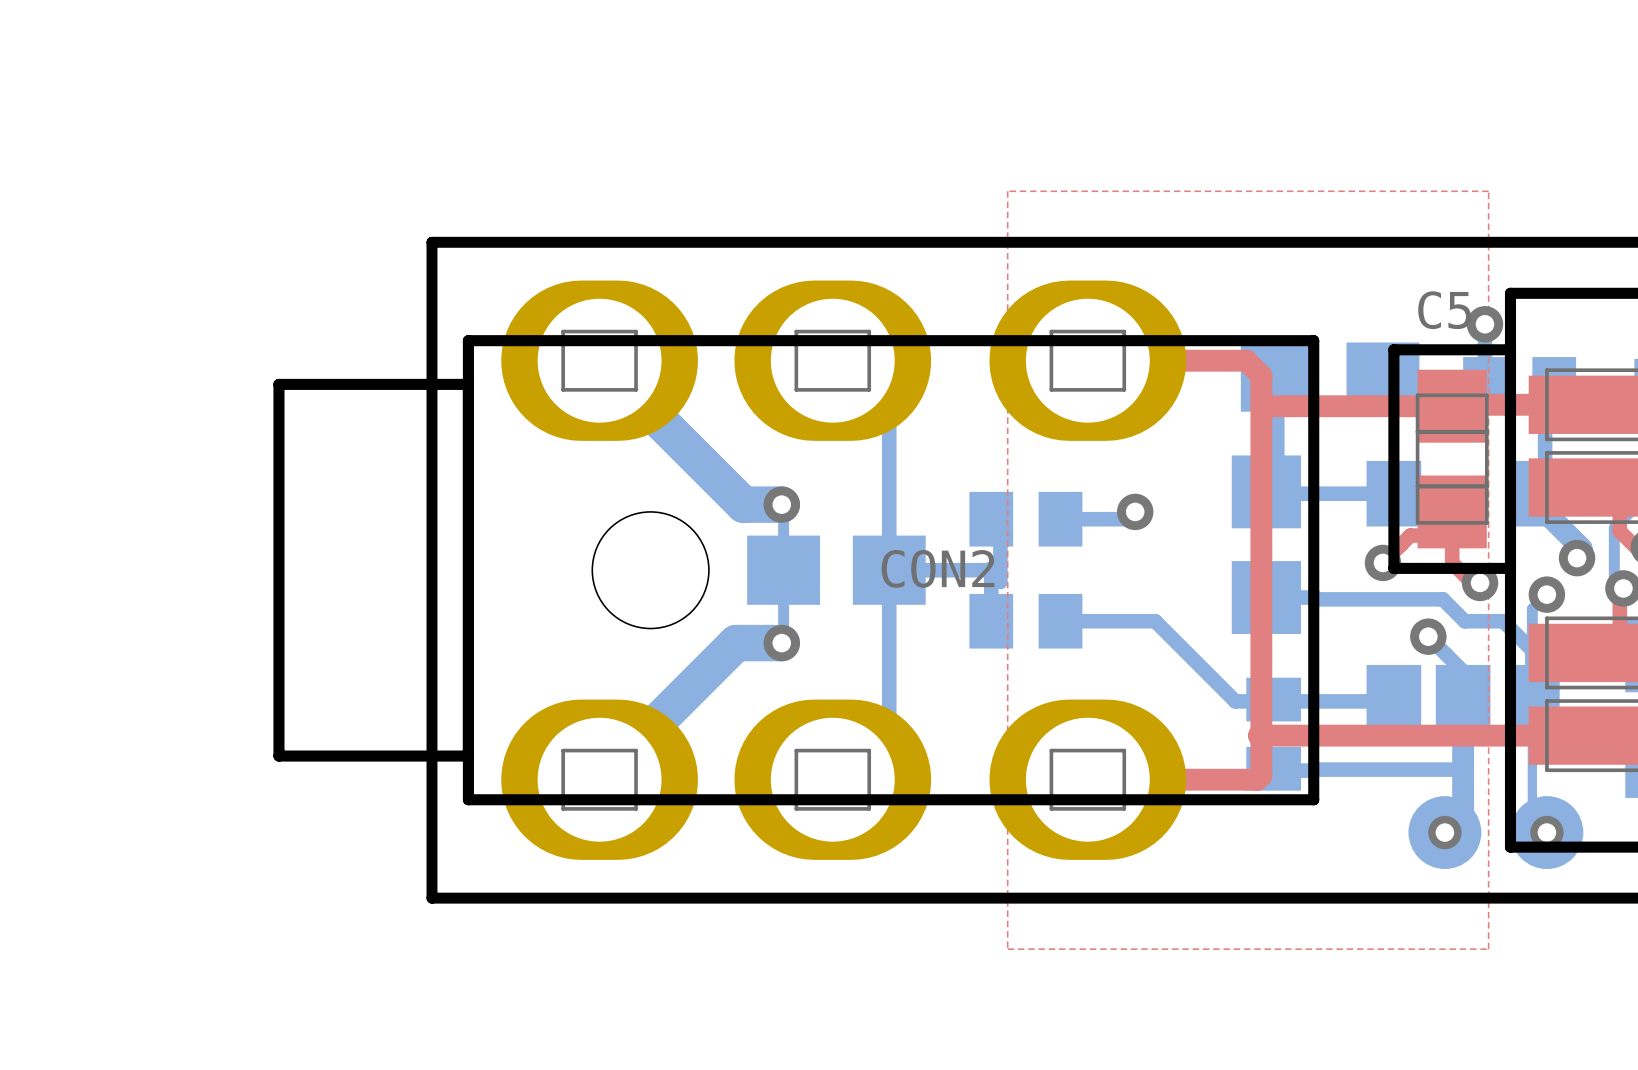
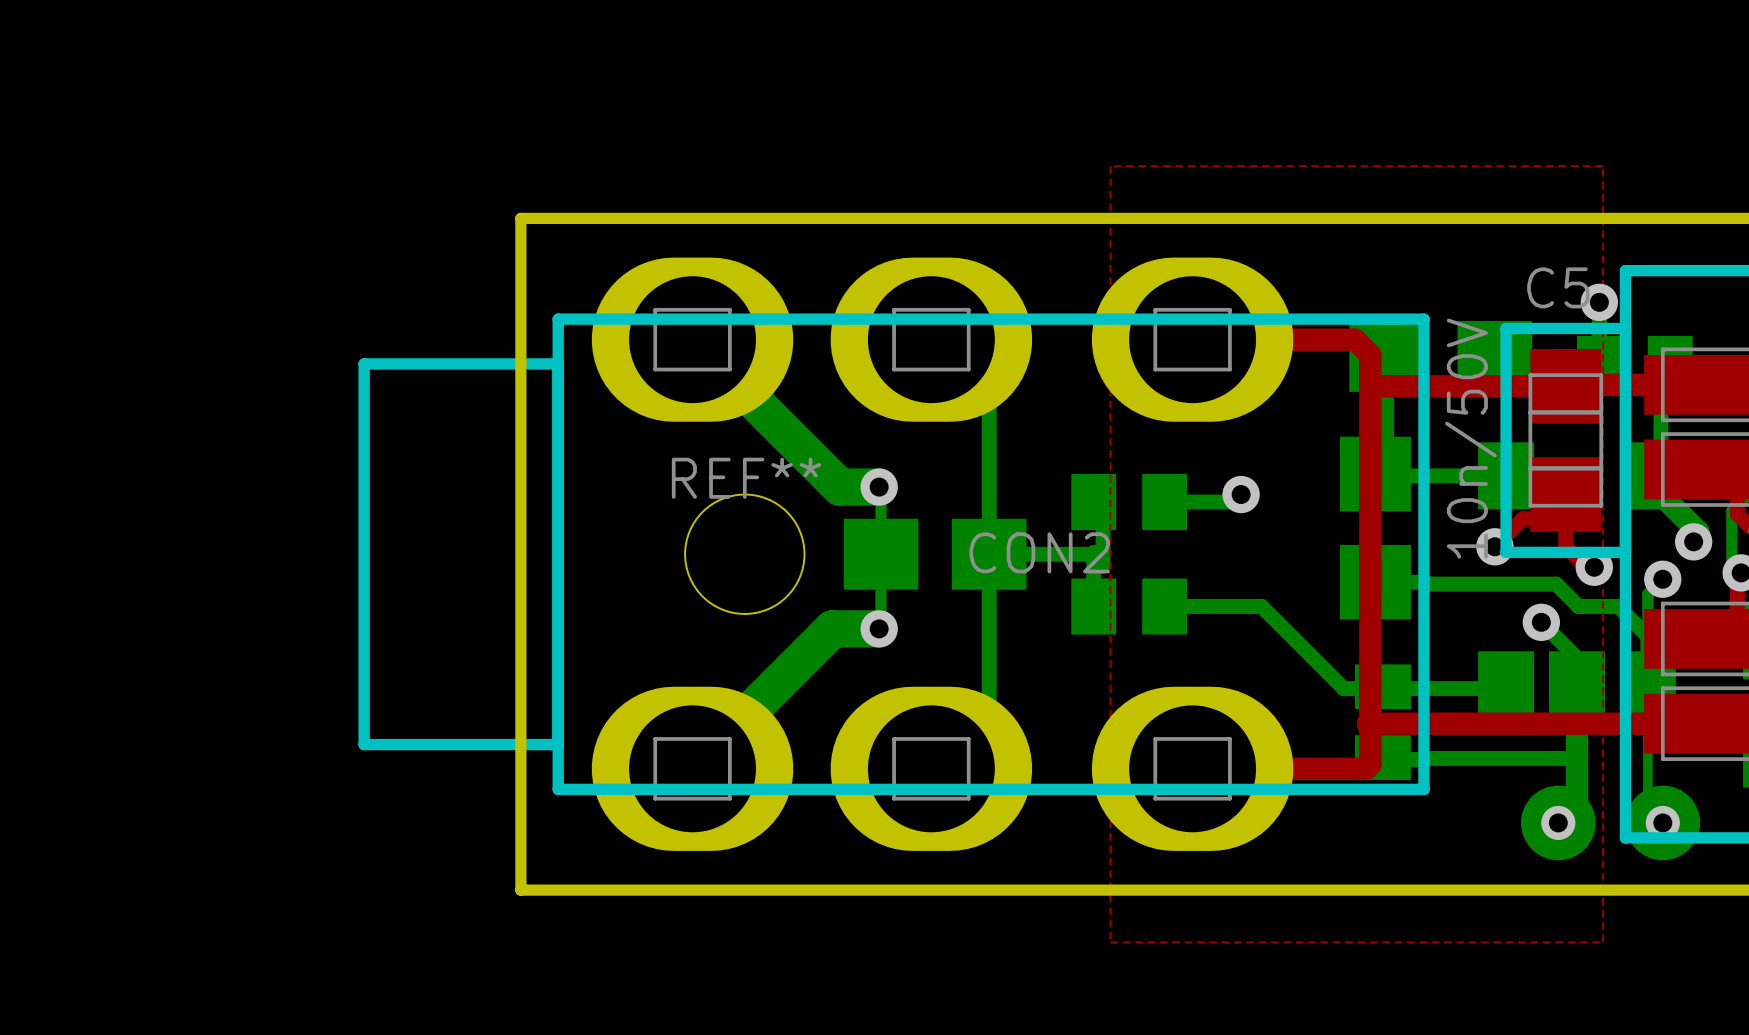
C5 value: none -> 10n/50V (1470, 438)
REF** name: none -> REF** (746, 478)

